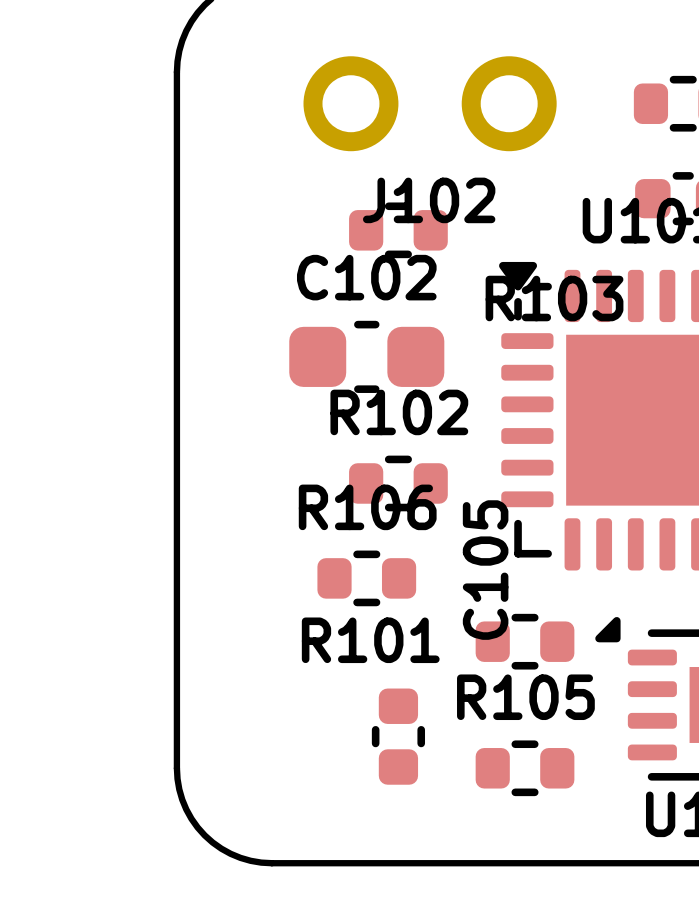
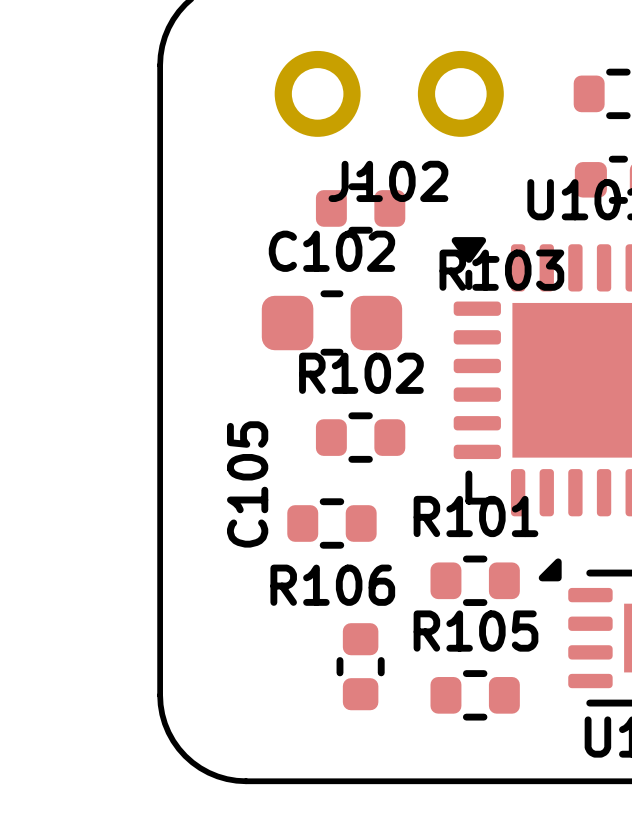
R106 name position: R106 (367, 507) -> R106 (332, 585)
C105 name position: C105 (485, 570) -> C105 (247, 484)
R101 name position: R101 (370, 640) -> R101 (475, 516)

